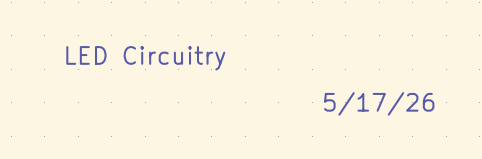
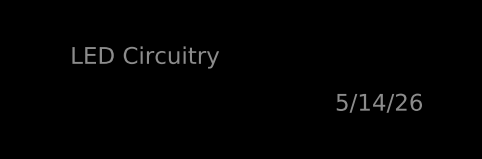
text: 5/17/26 (379, 103) -> 5/14/26 (379, 103)

